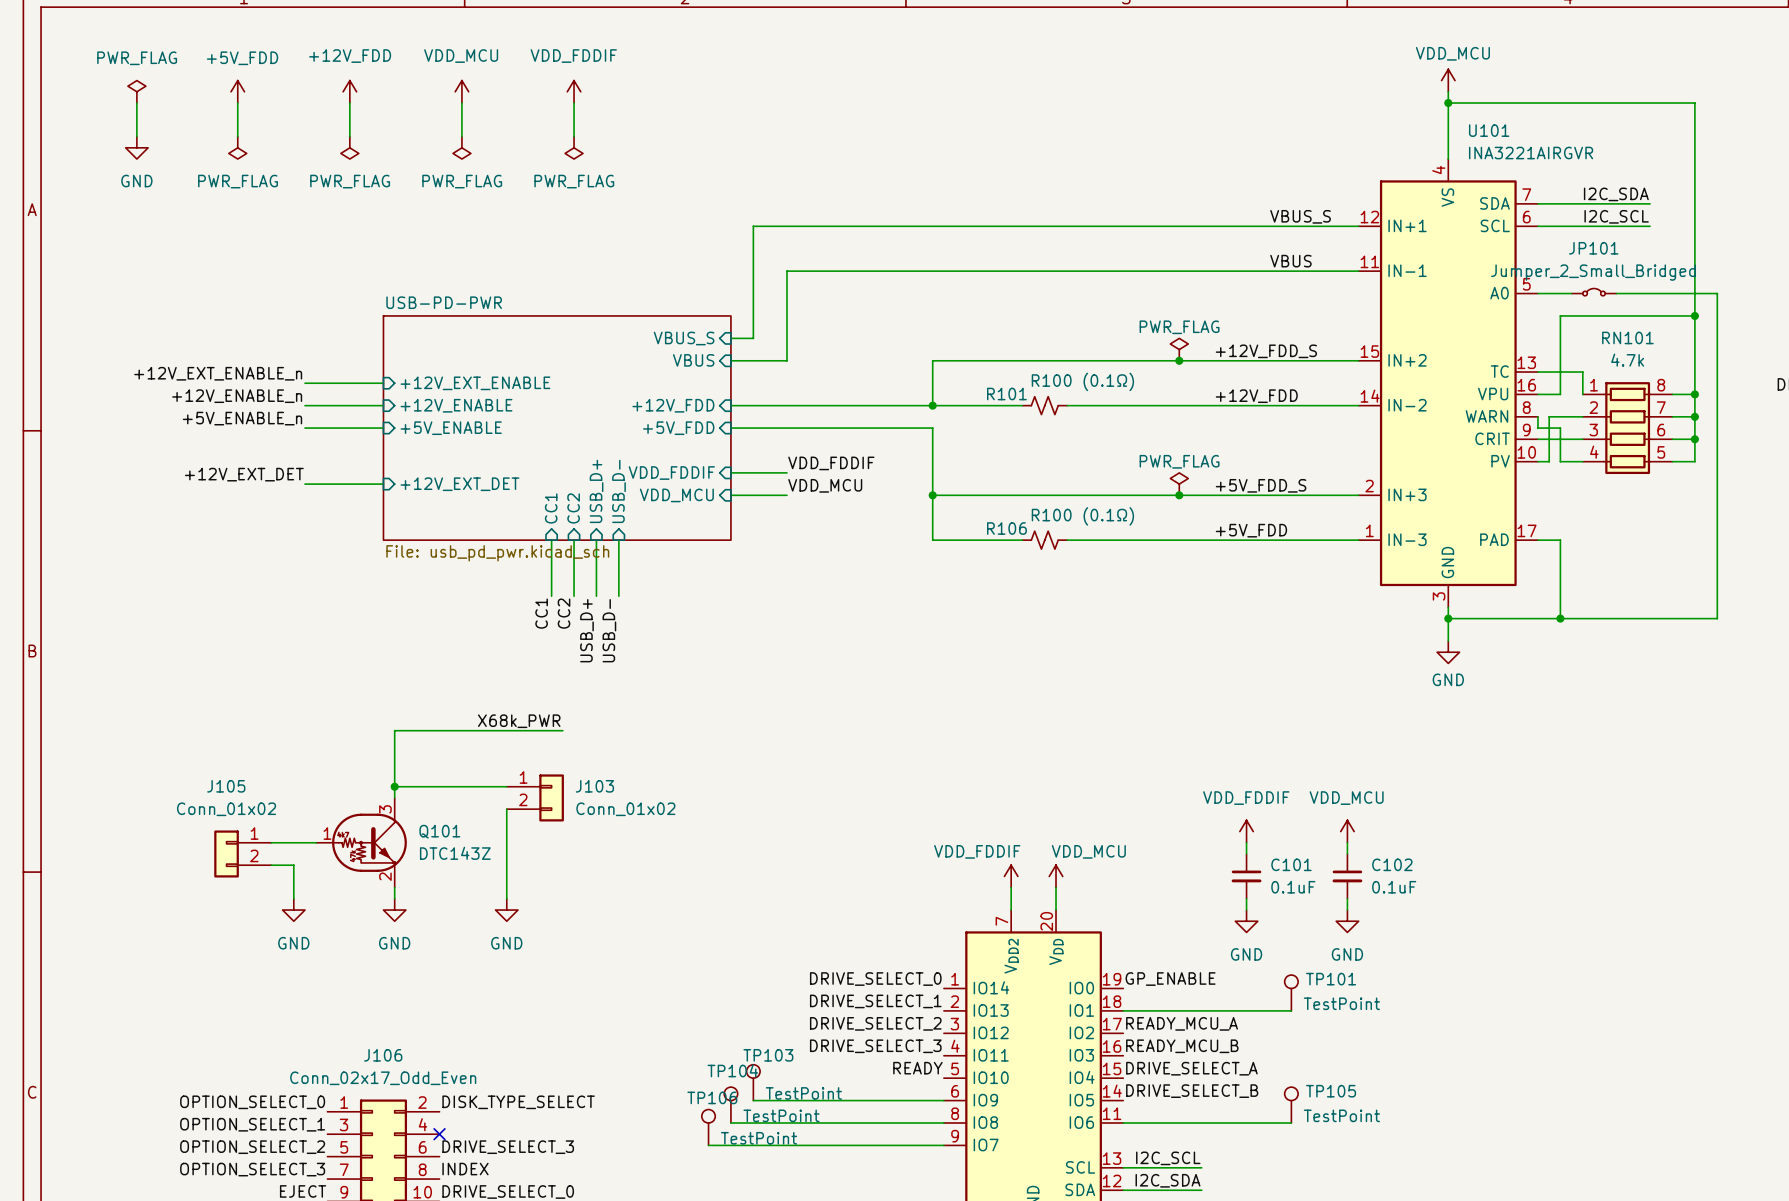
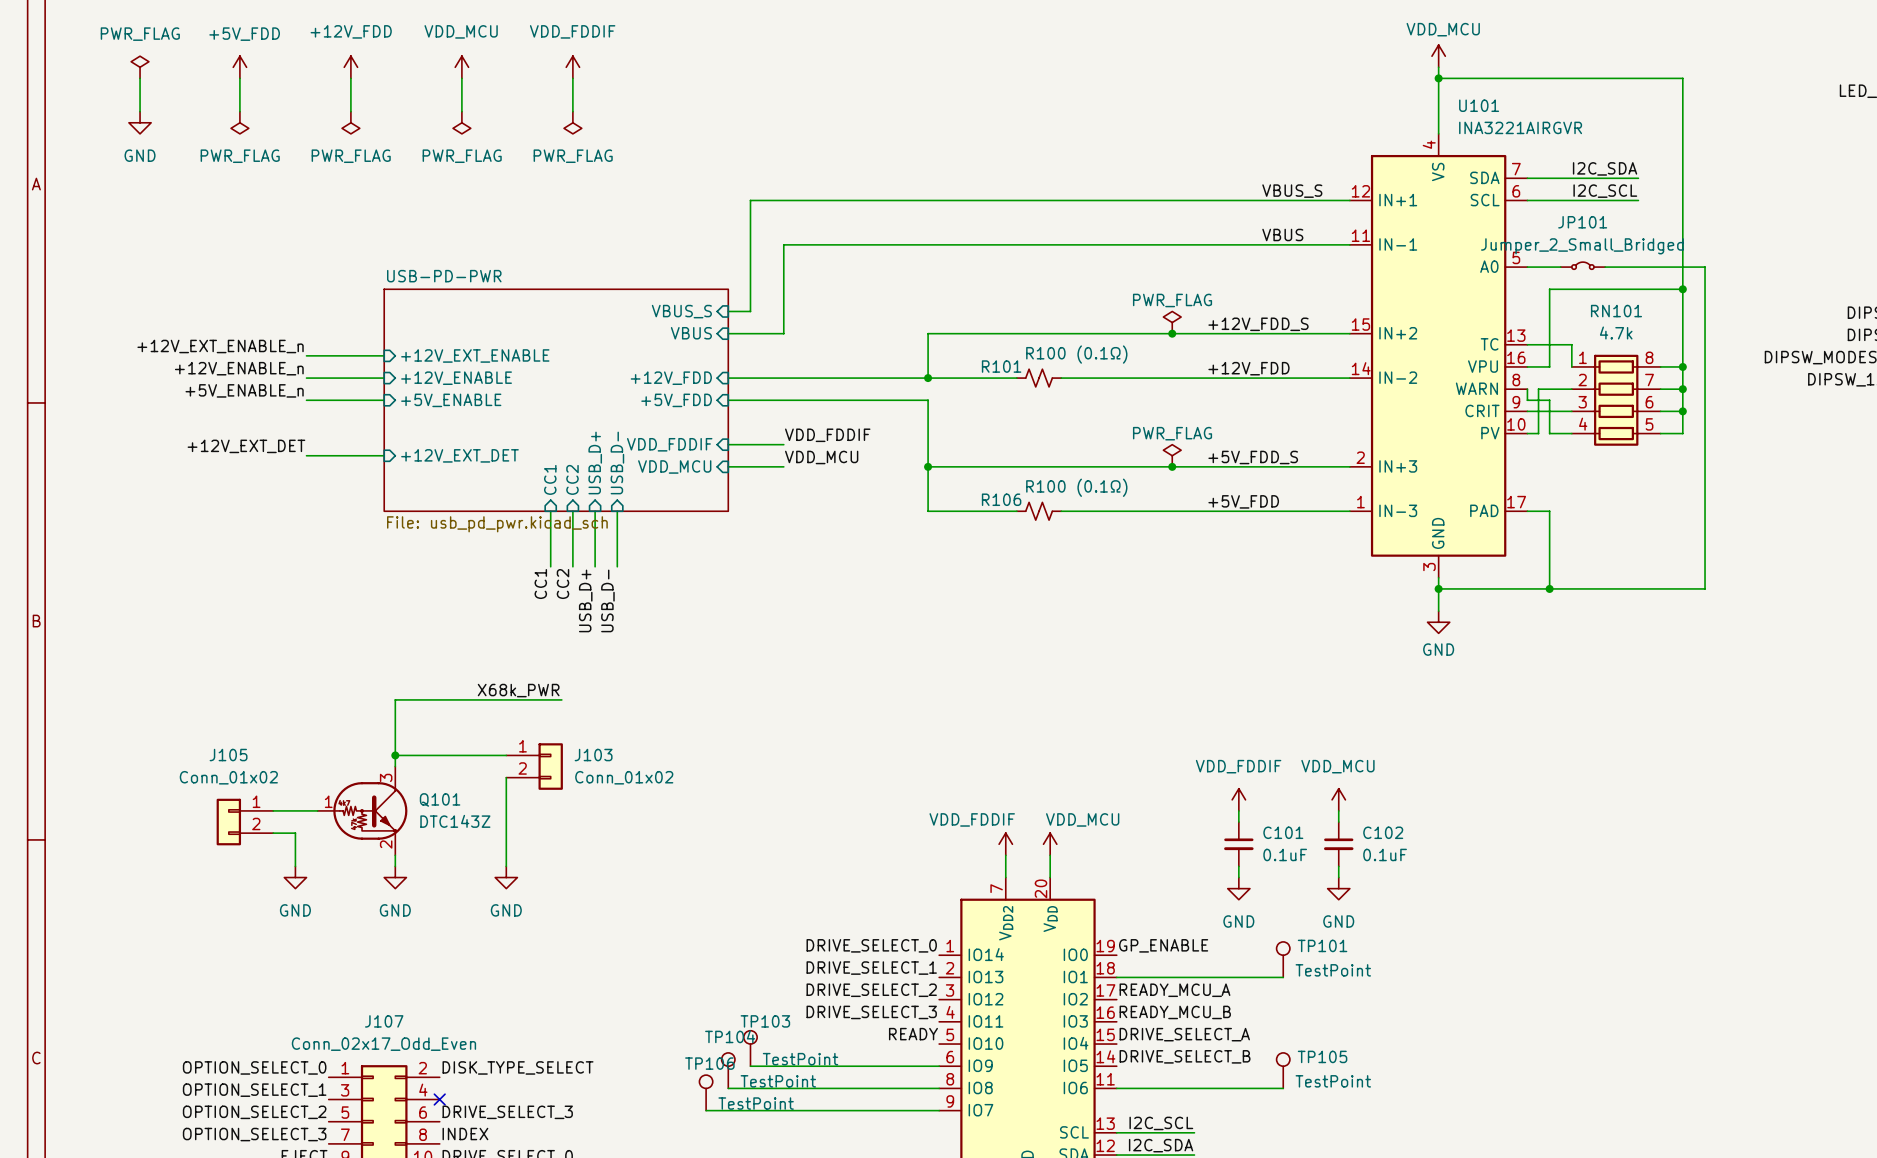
J106 name: J106 (383, 1055) -> J107 (384, 1021)

